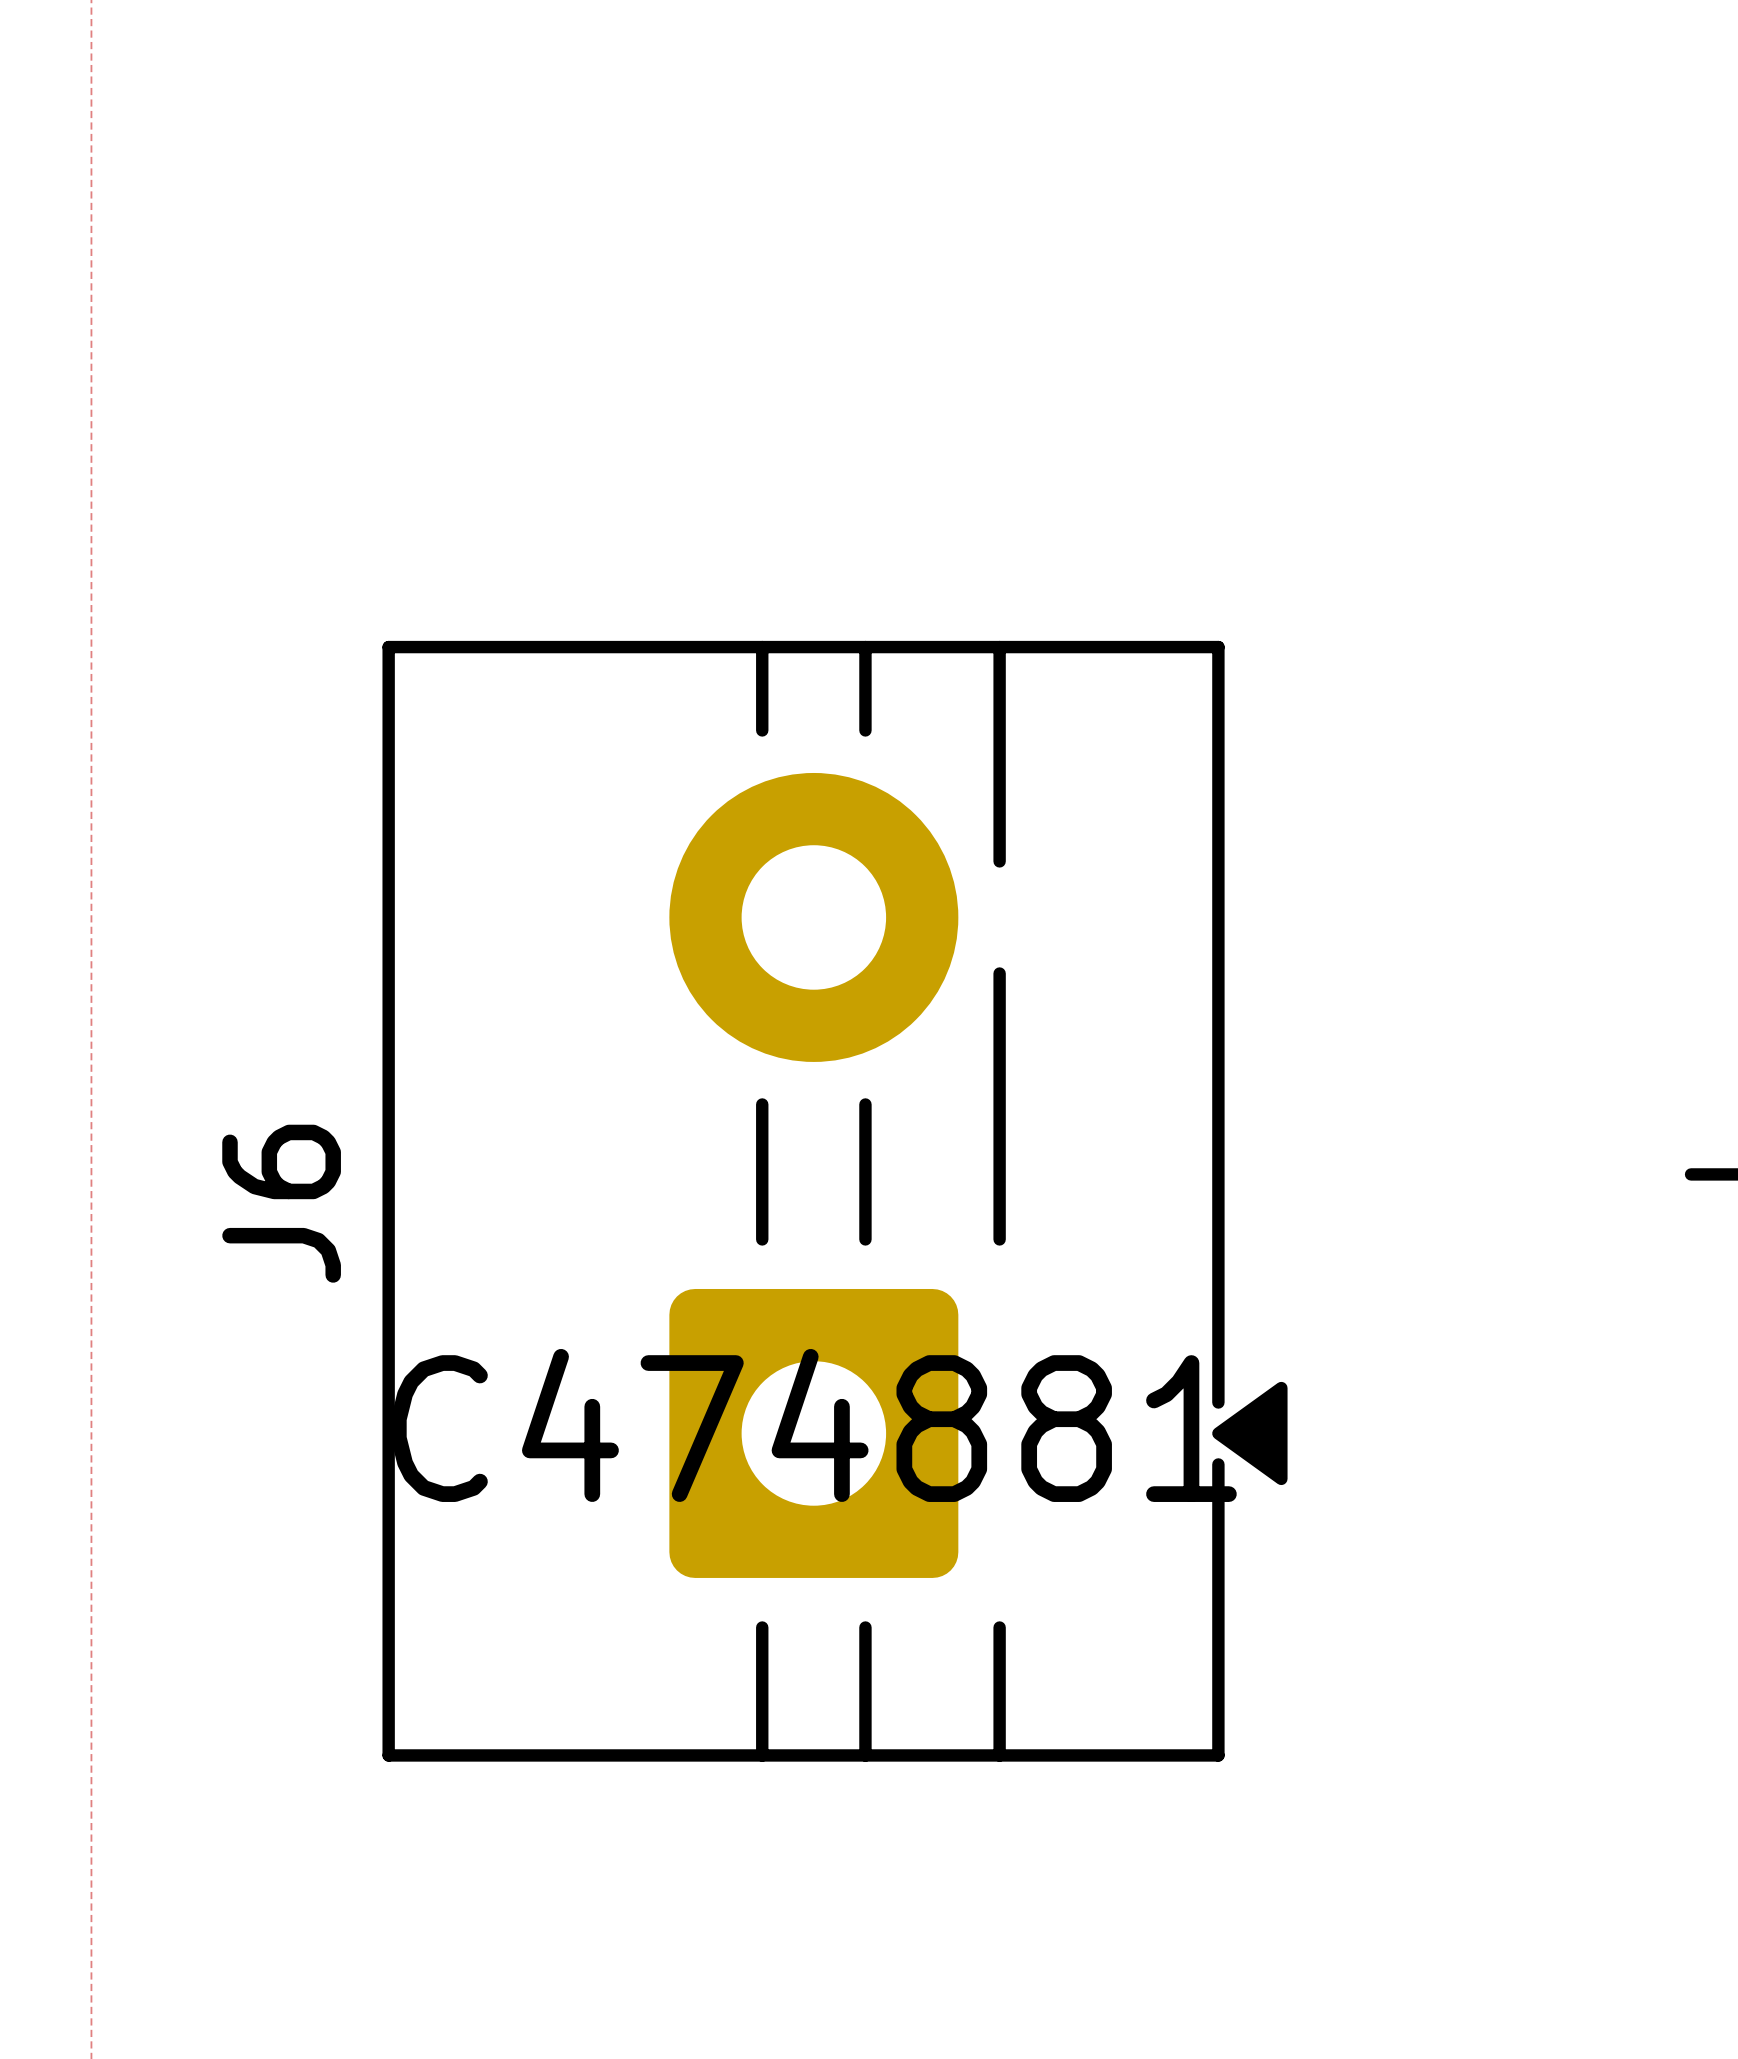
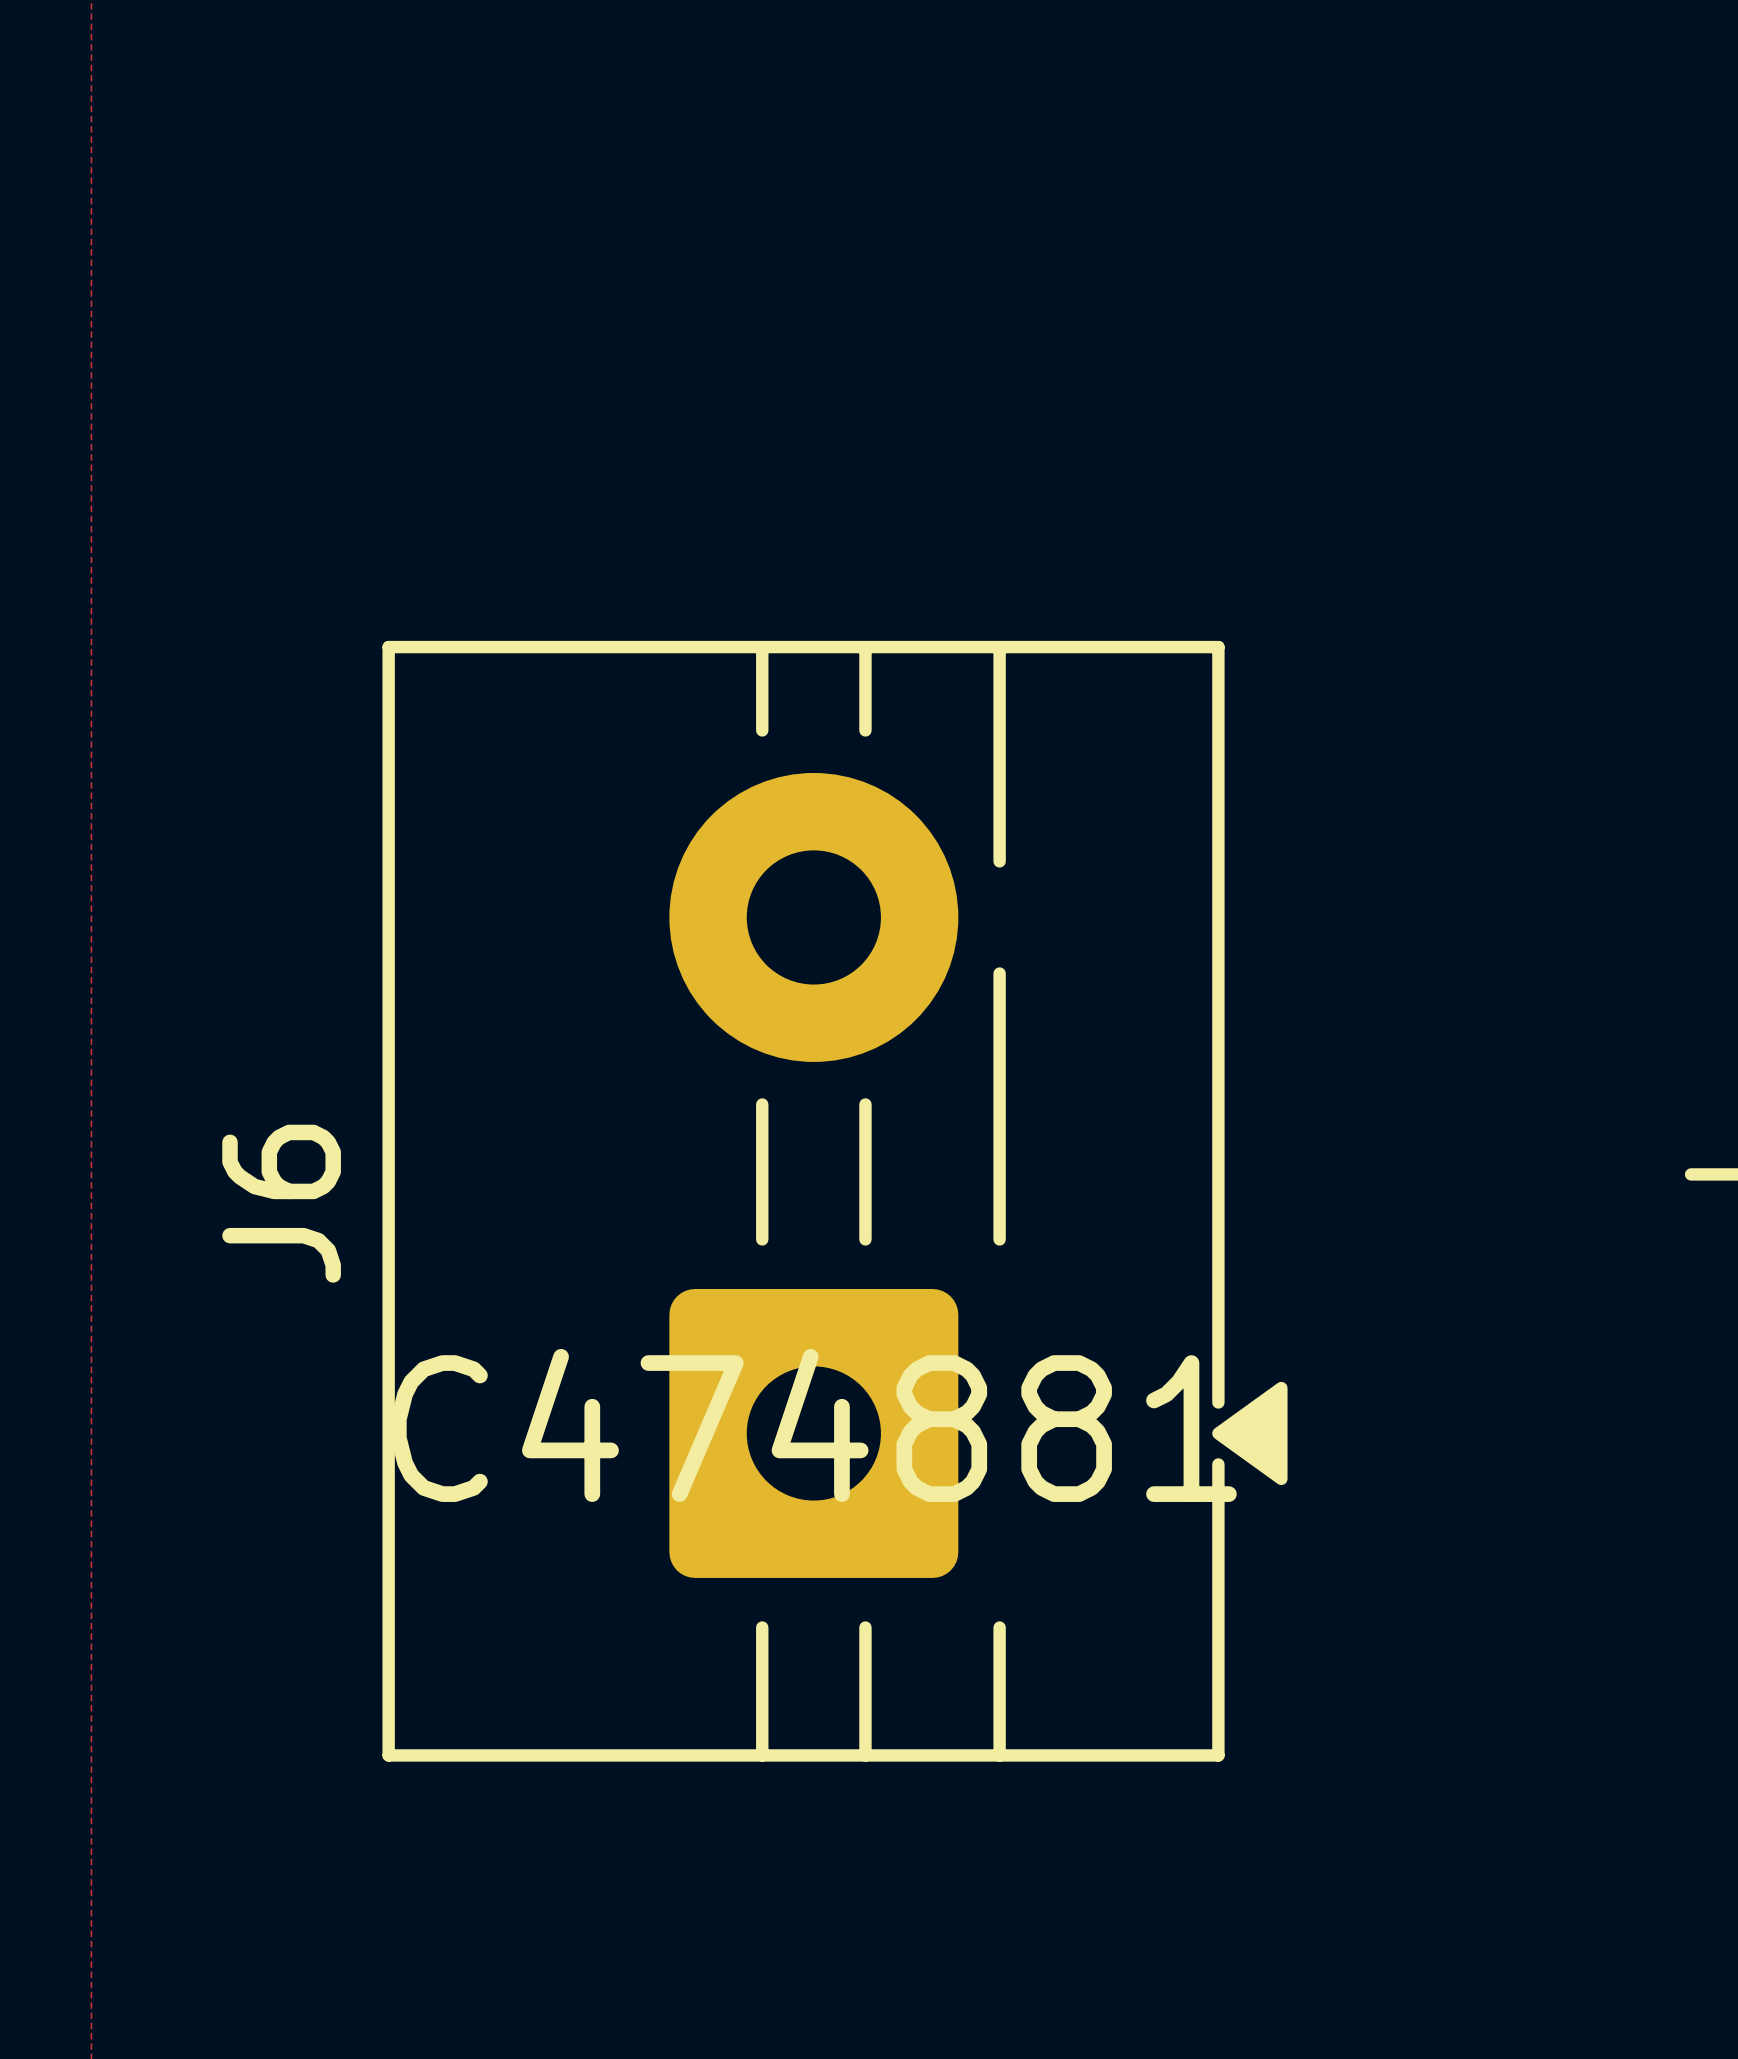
J6 footprint: [382, 640, 1288, 1762] -> [382, 640, 1288, 1762]

